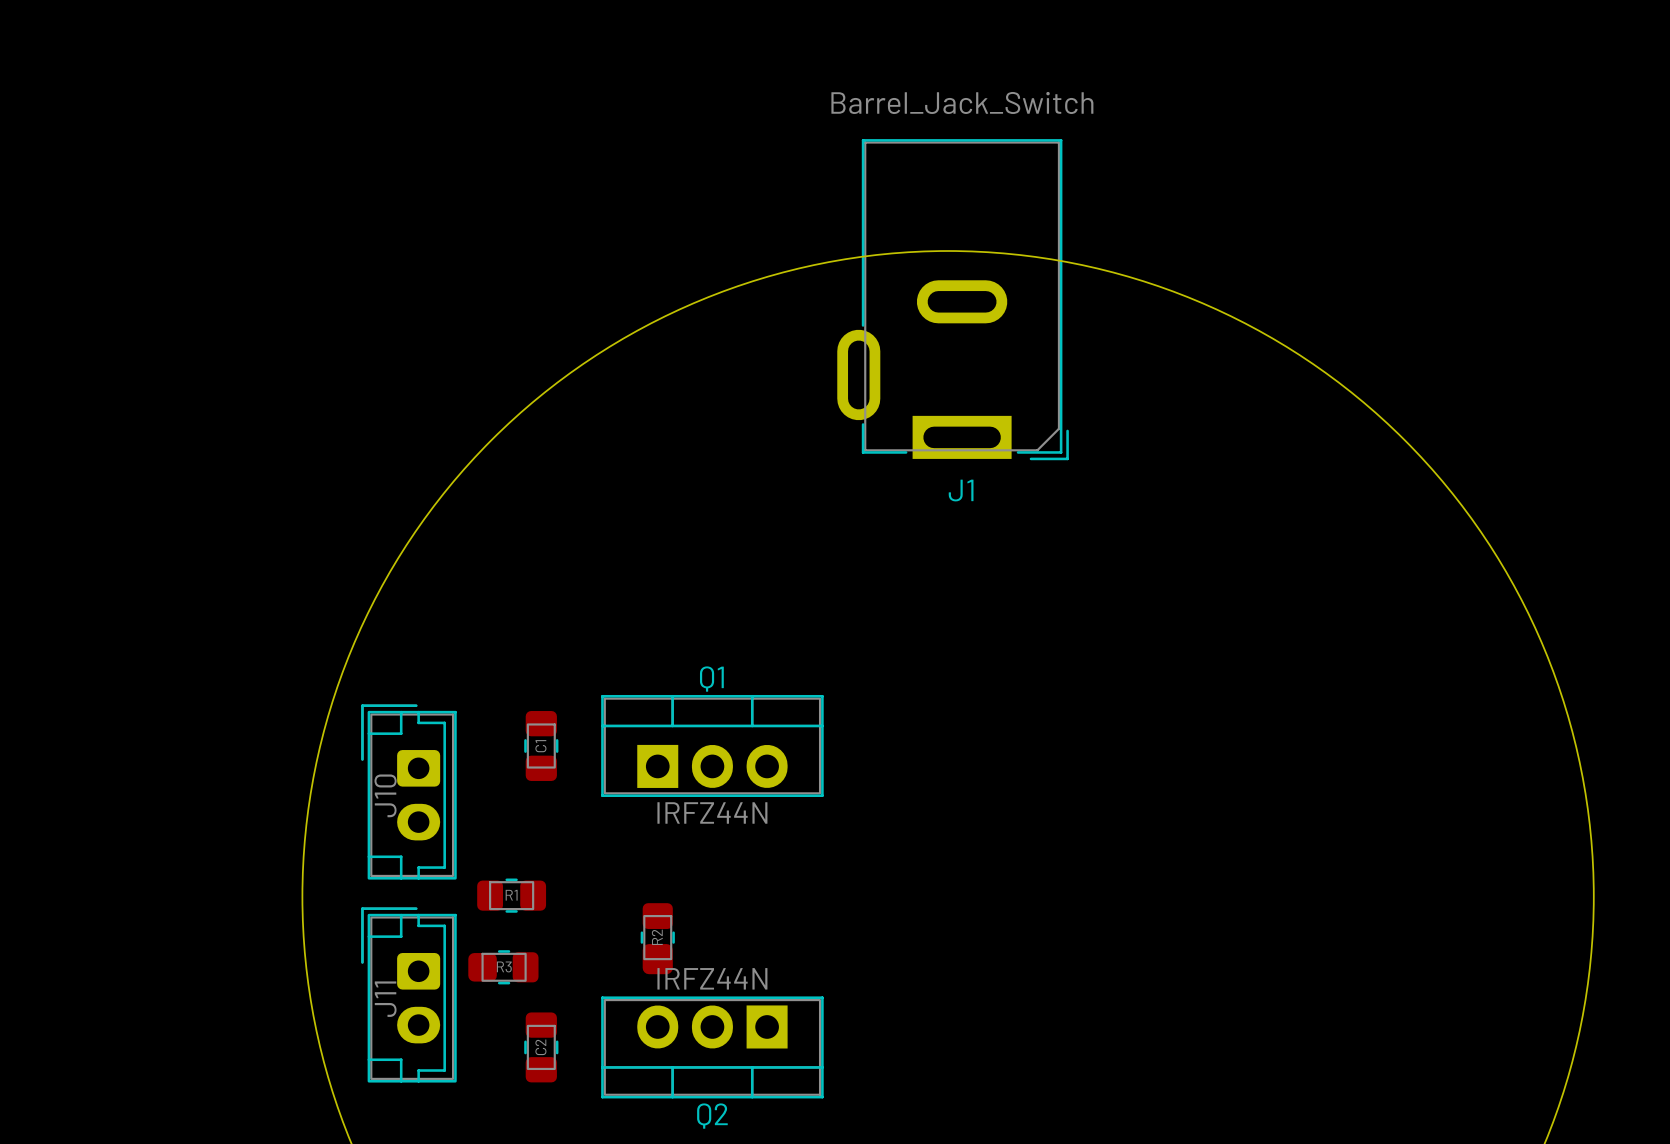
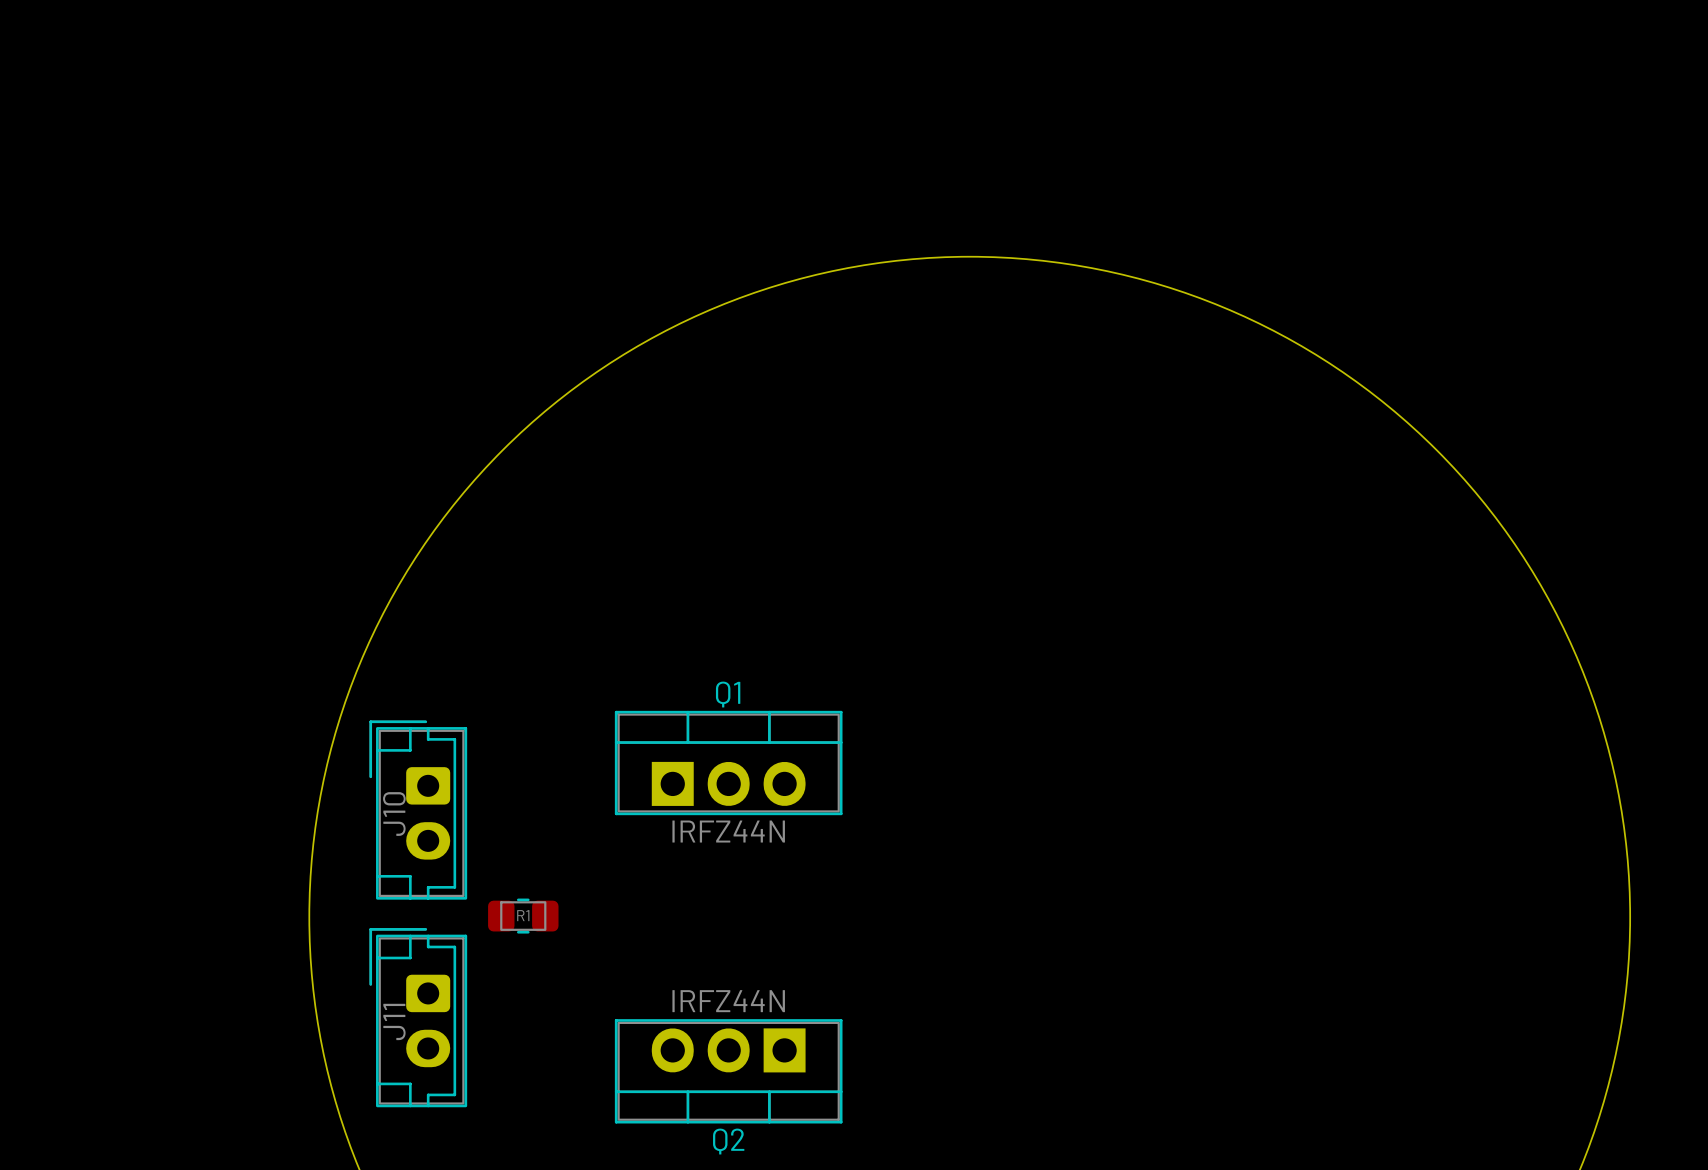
J1: Barrel_Jack_Switch (953, 299) -> none
C1: (541, 745) -> none
R2: (657, 938) -> none
R3: (503, 967) -> none
C2: (541, 1047) -> none

